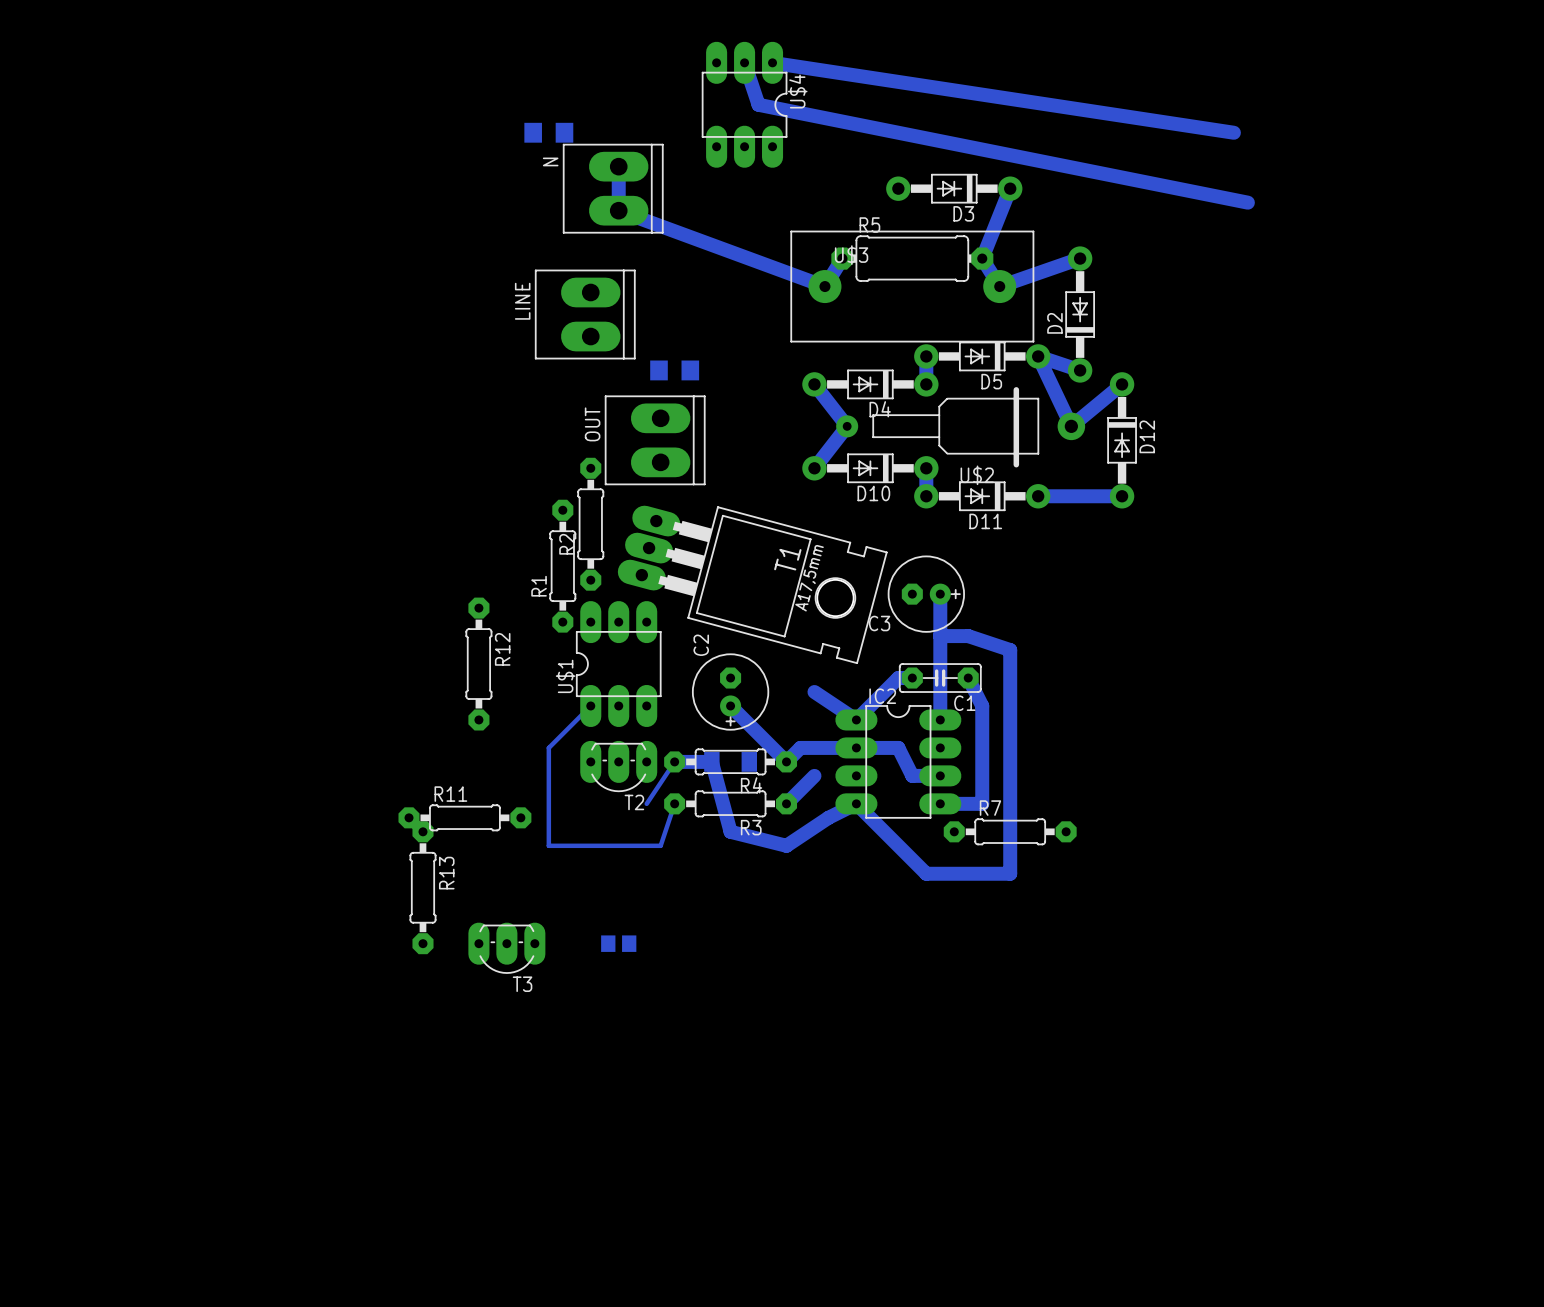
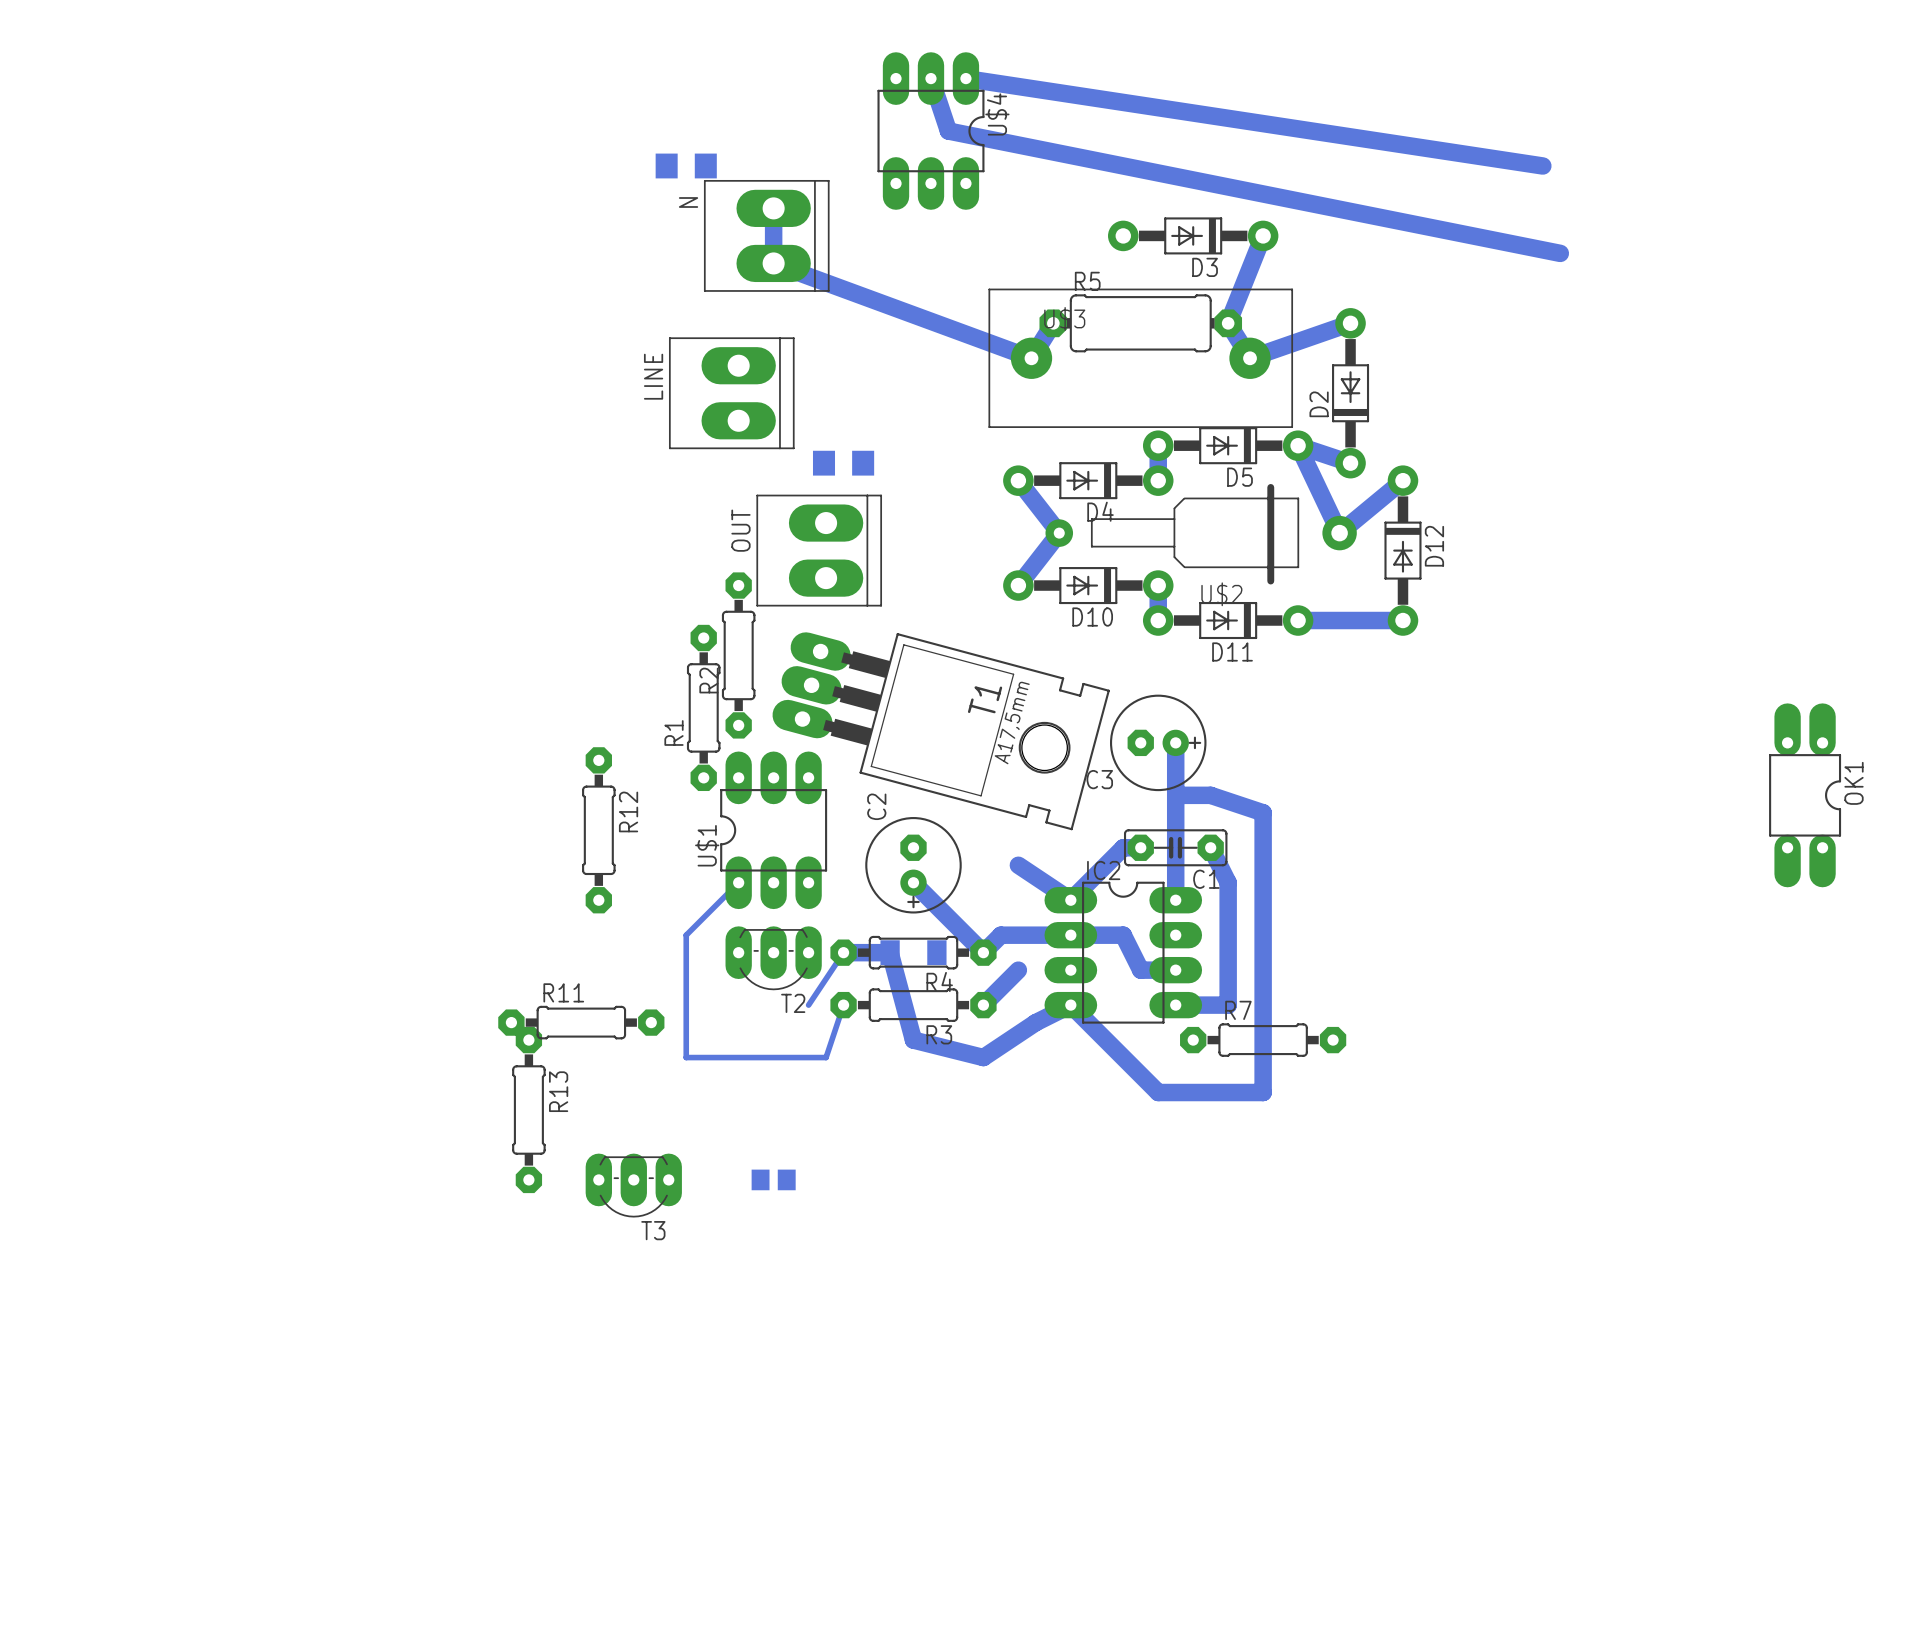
OK1: none -> (1805, 795)

